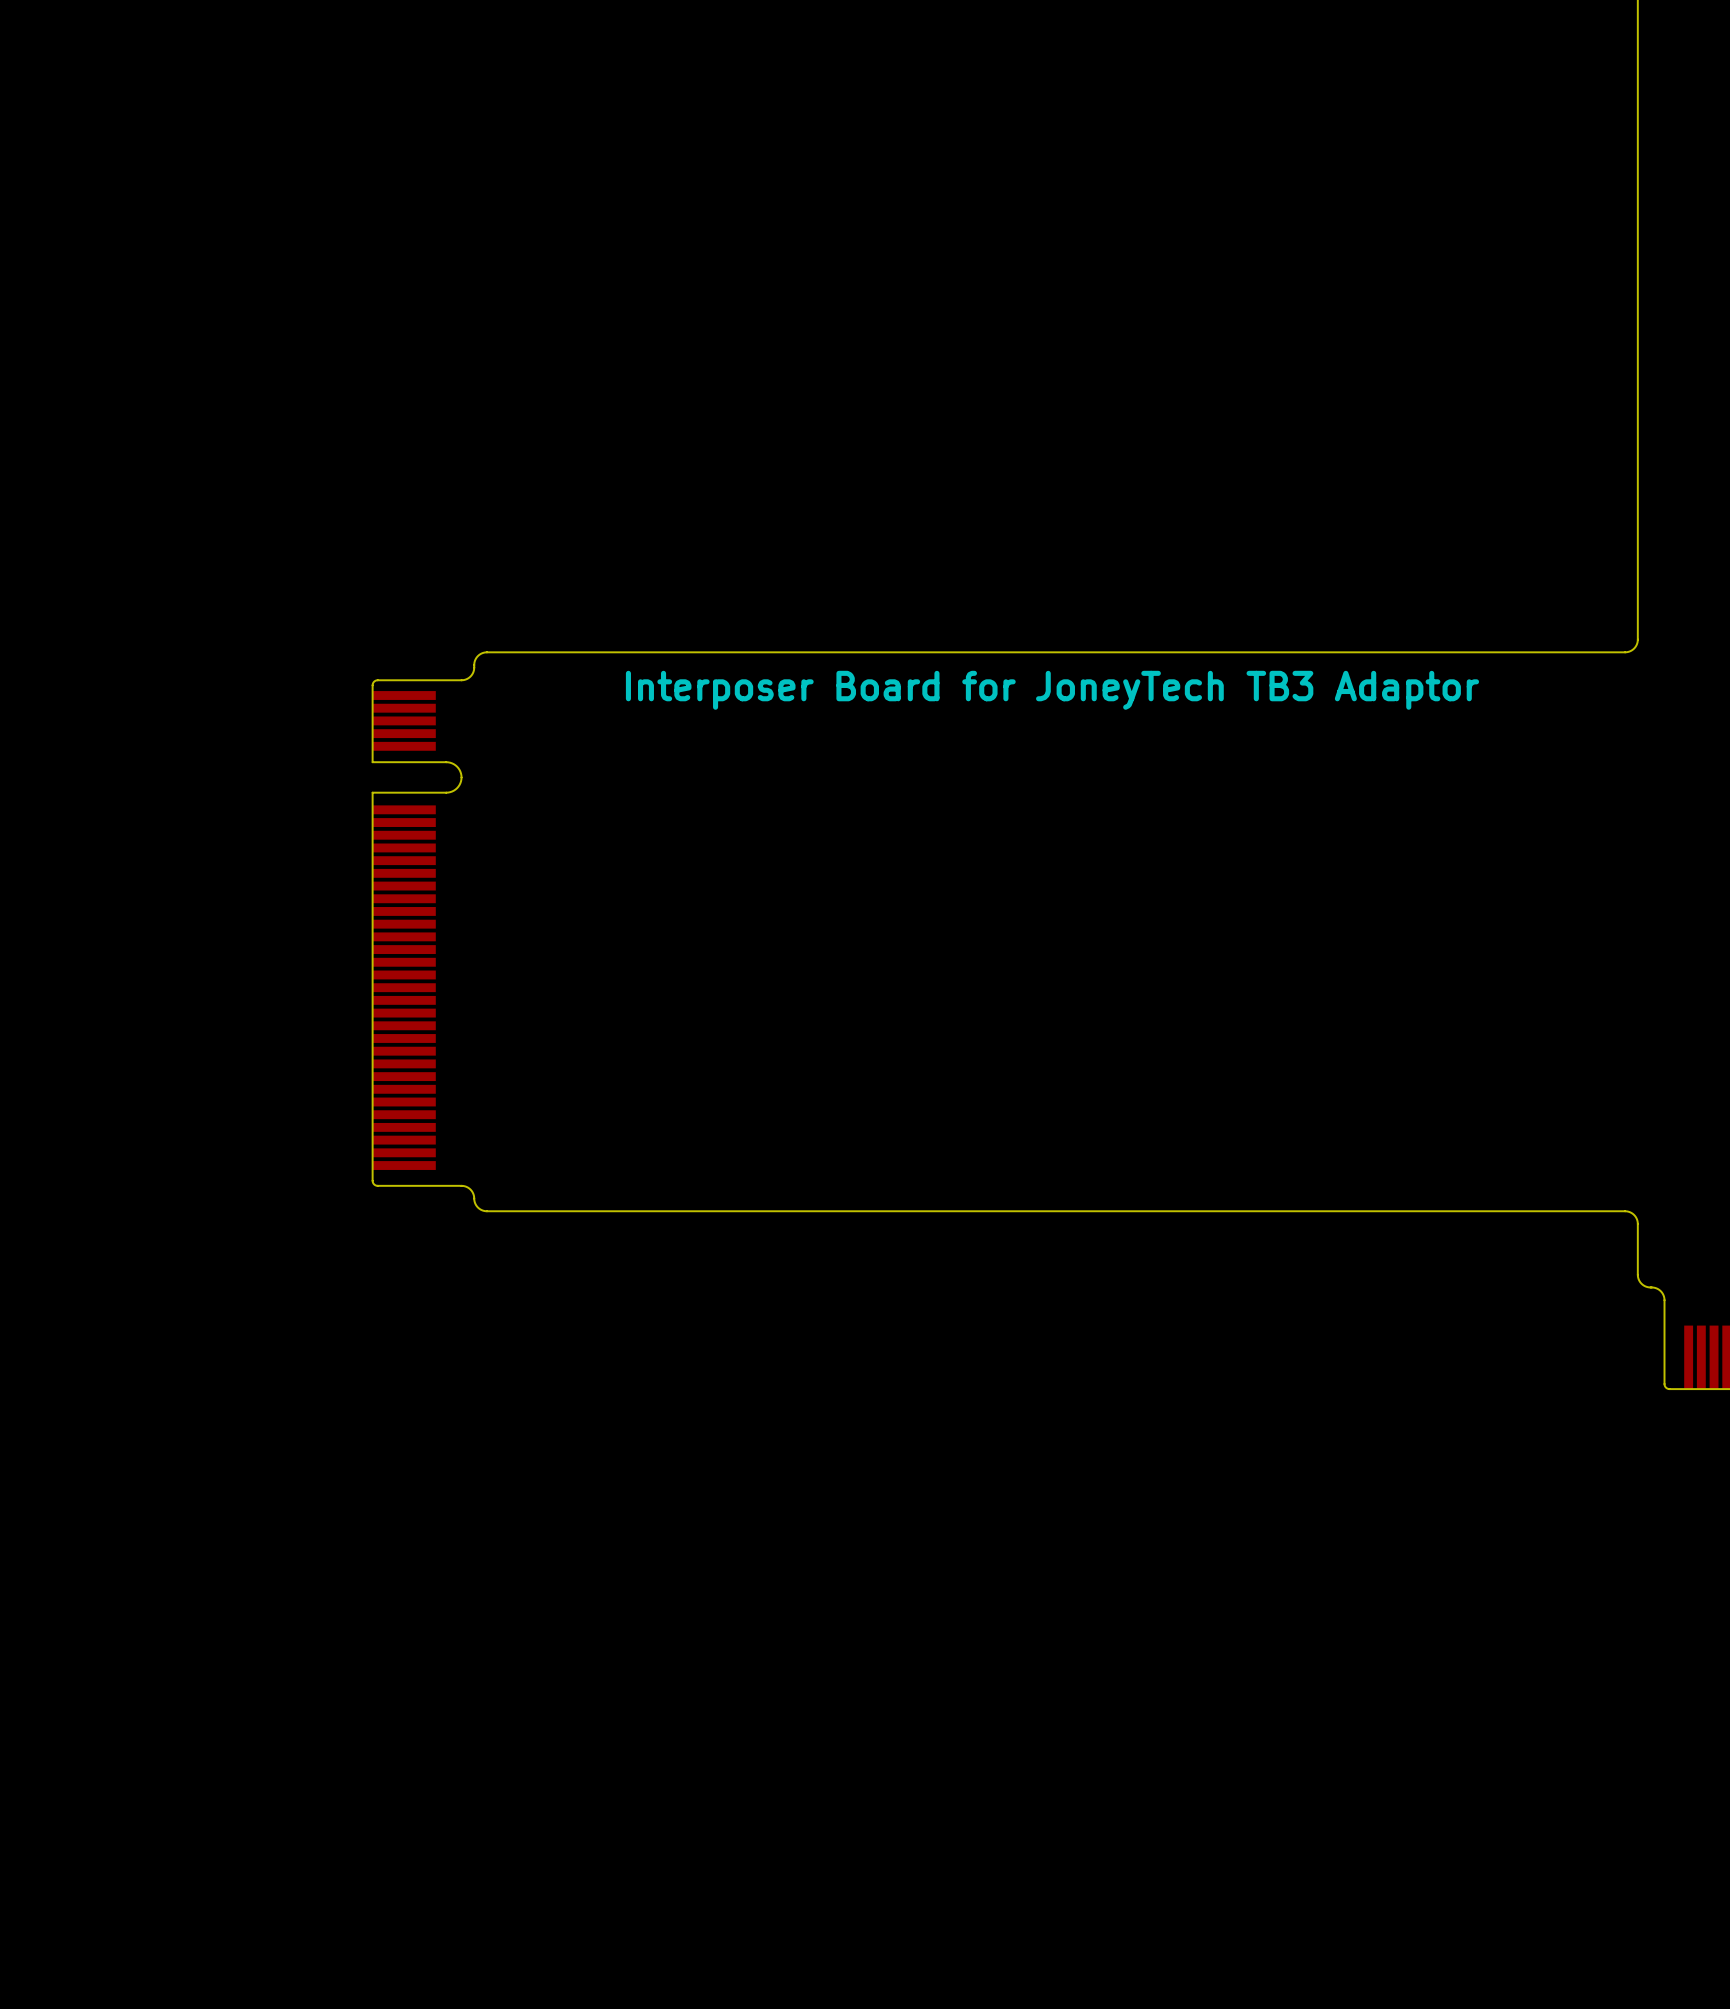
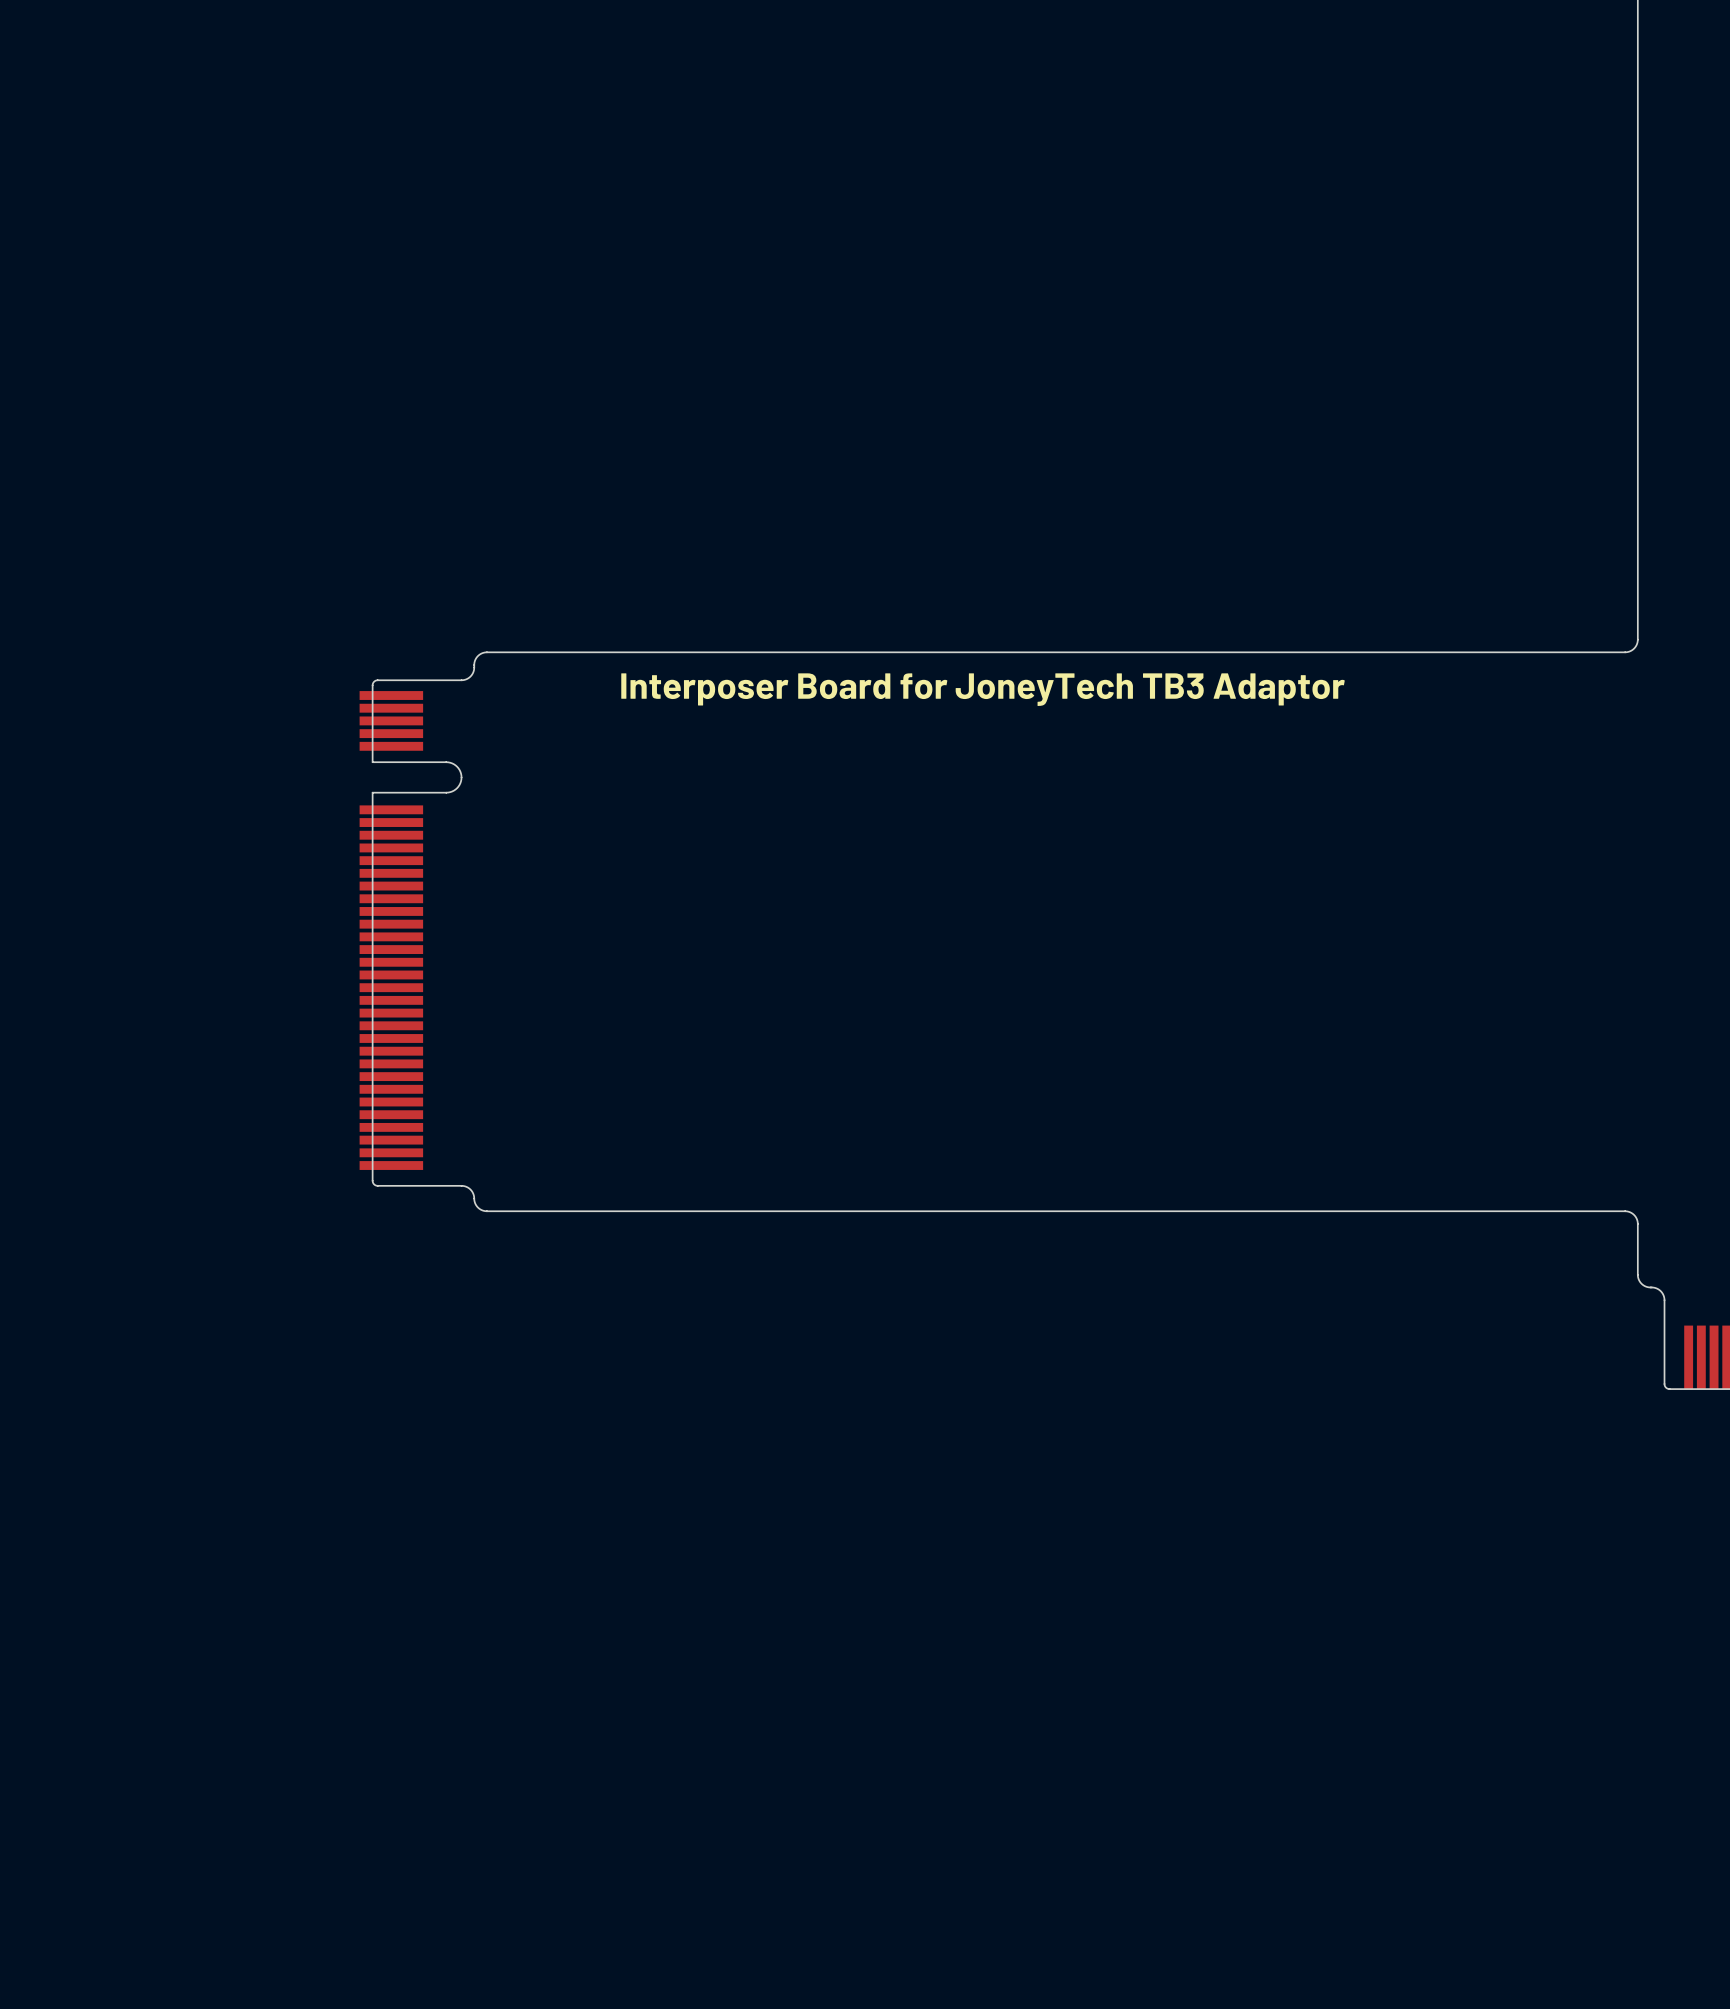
part position: (404, 930) -> (391, 930)

